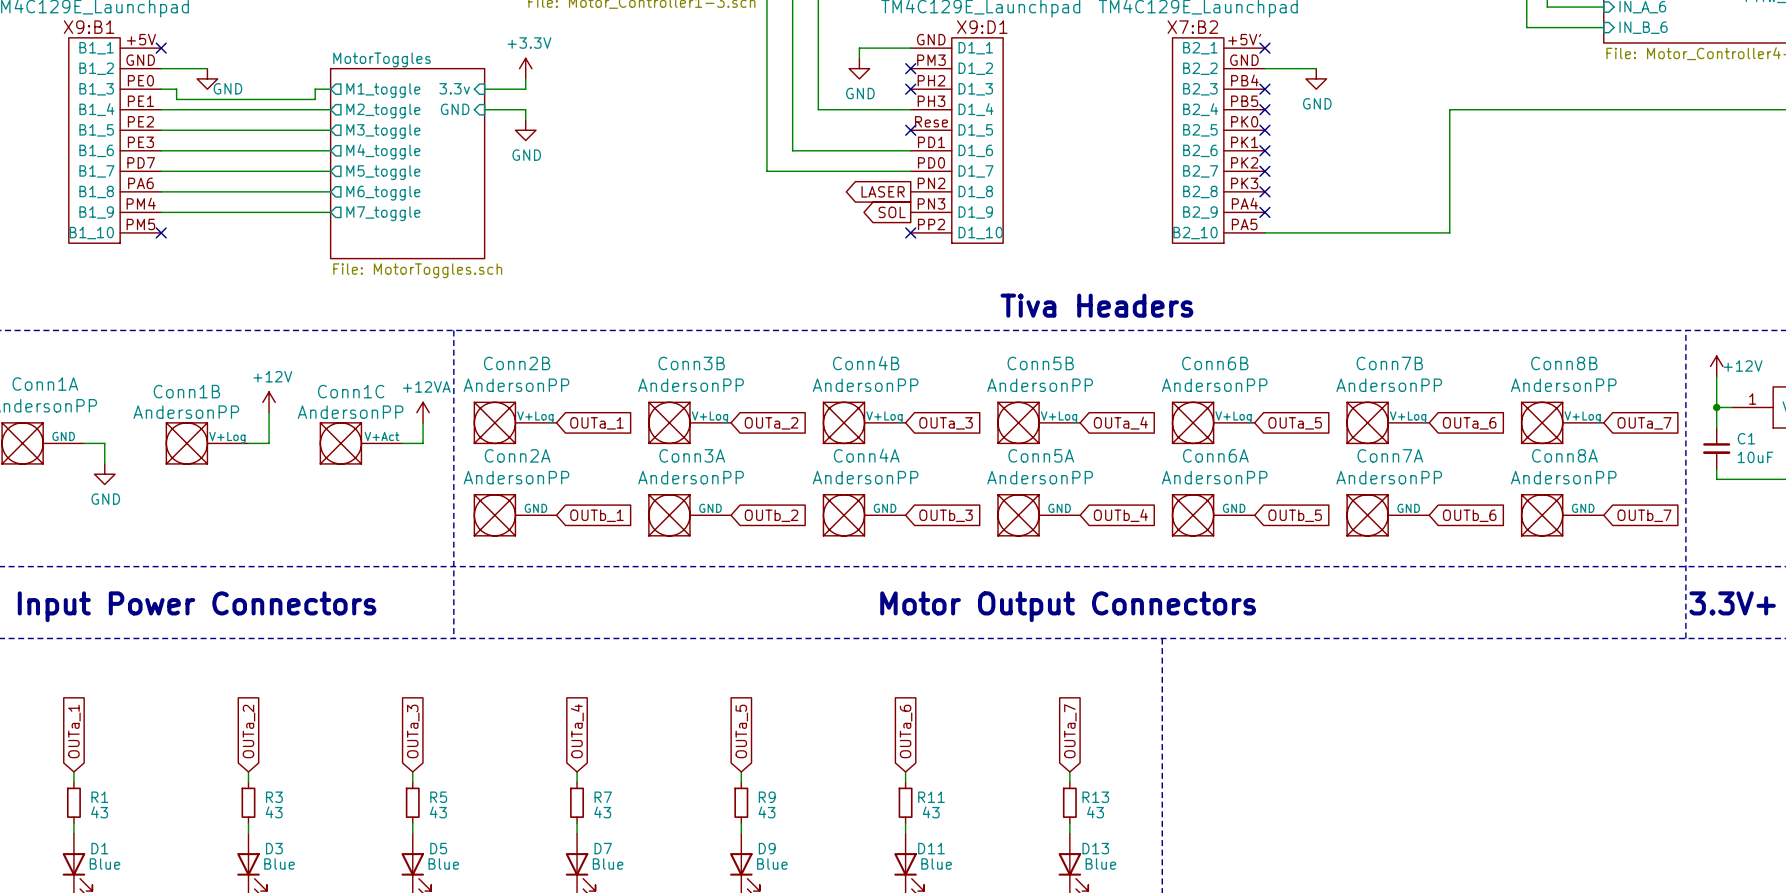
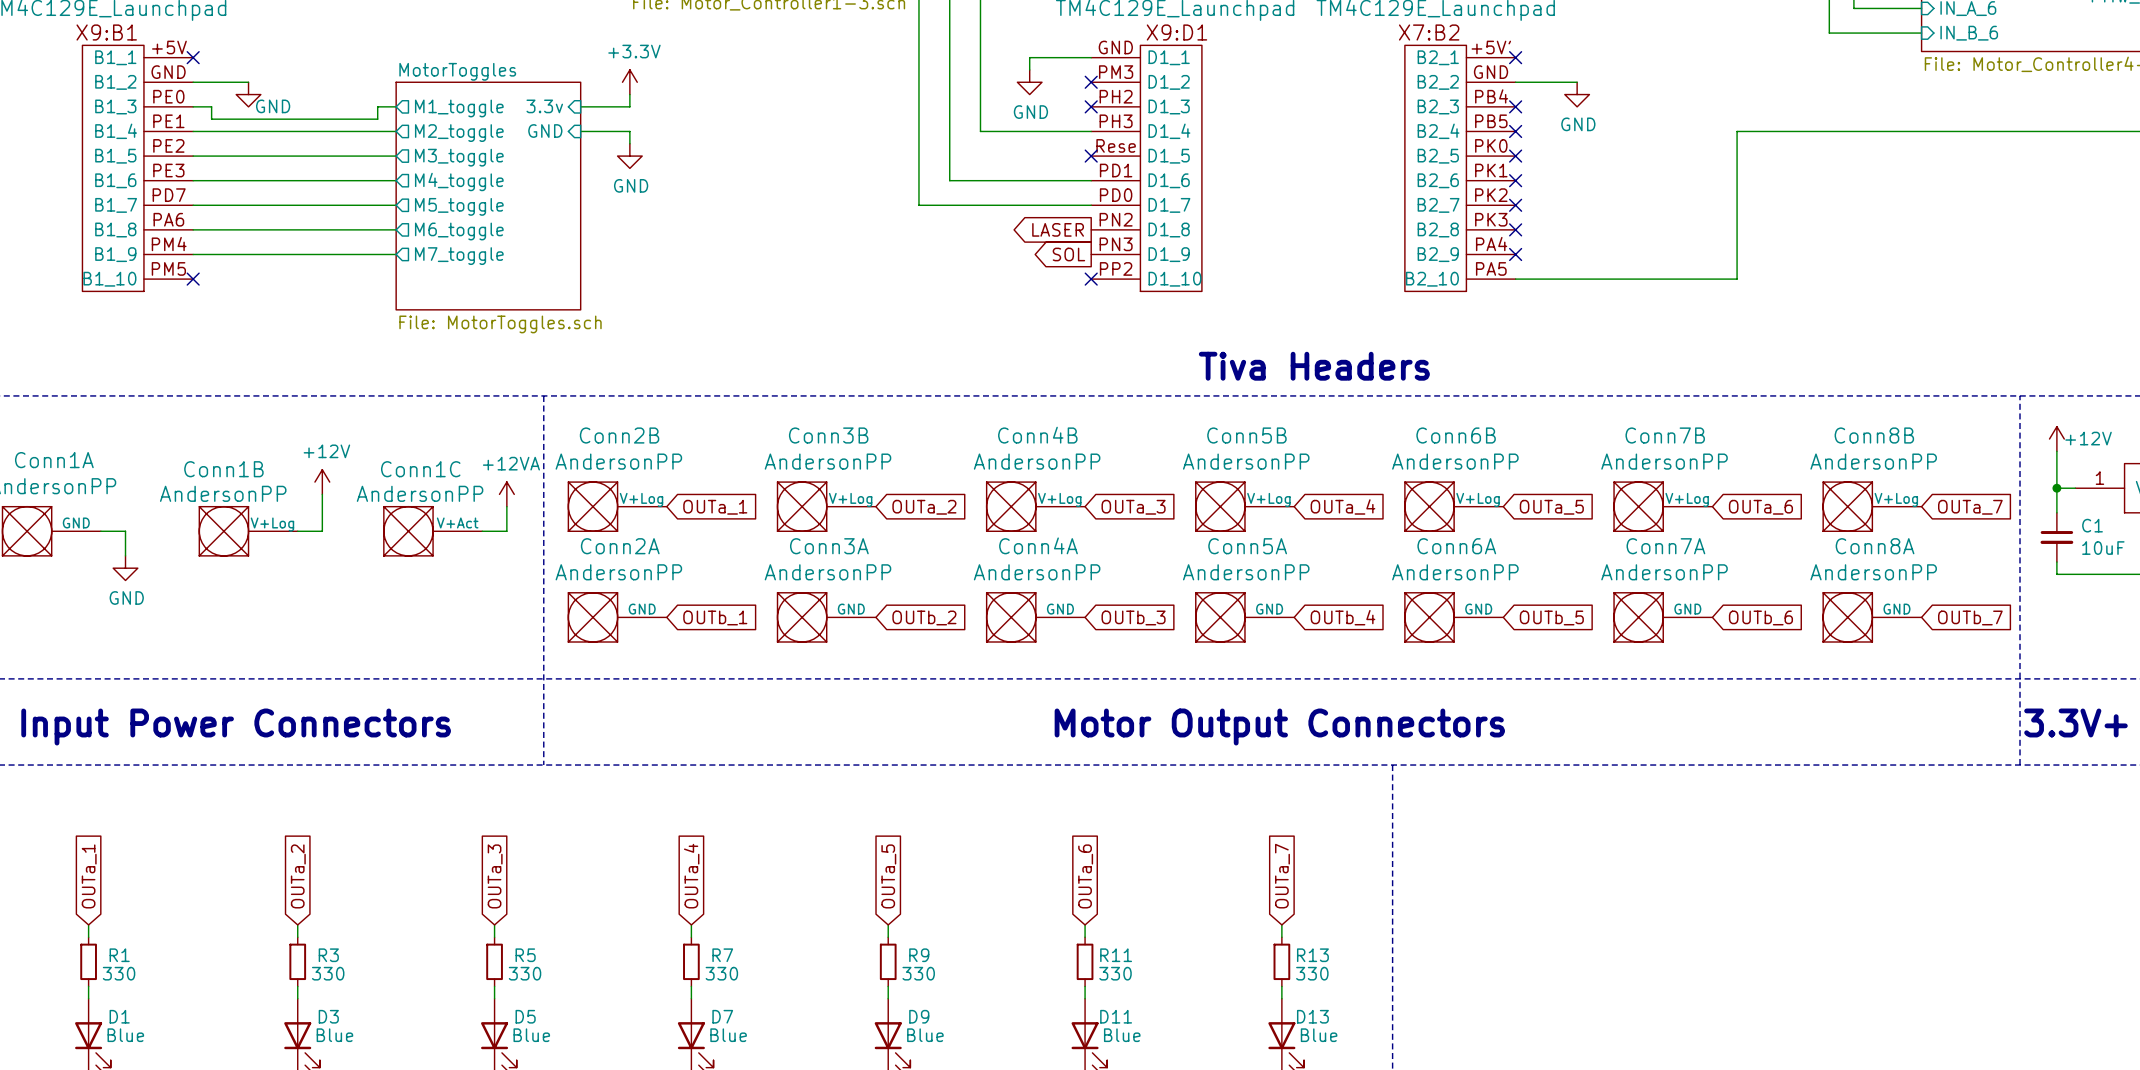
R1 value: 43 (99, 812) -> 330 (119, 973)
R3 value: 43 (274, 812) -> 330 (328, 973)
R5 value: 43 (438, 812) -> 330 (525, 973)
R7 value: 43 (602, 812) -> 330 (721, 973)
R9 value: 43 (766, 812) -> 330 (918, 973)
R11 value: 43 (931, 812) -> 330 (1115, 973)
R13 value: 43 (1095, 812) -> 330 (1312, 973)

